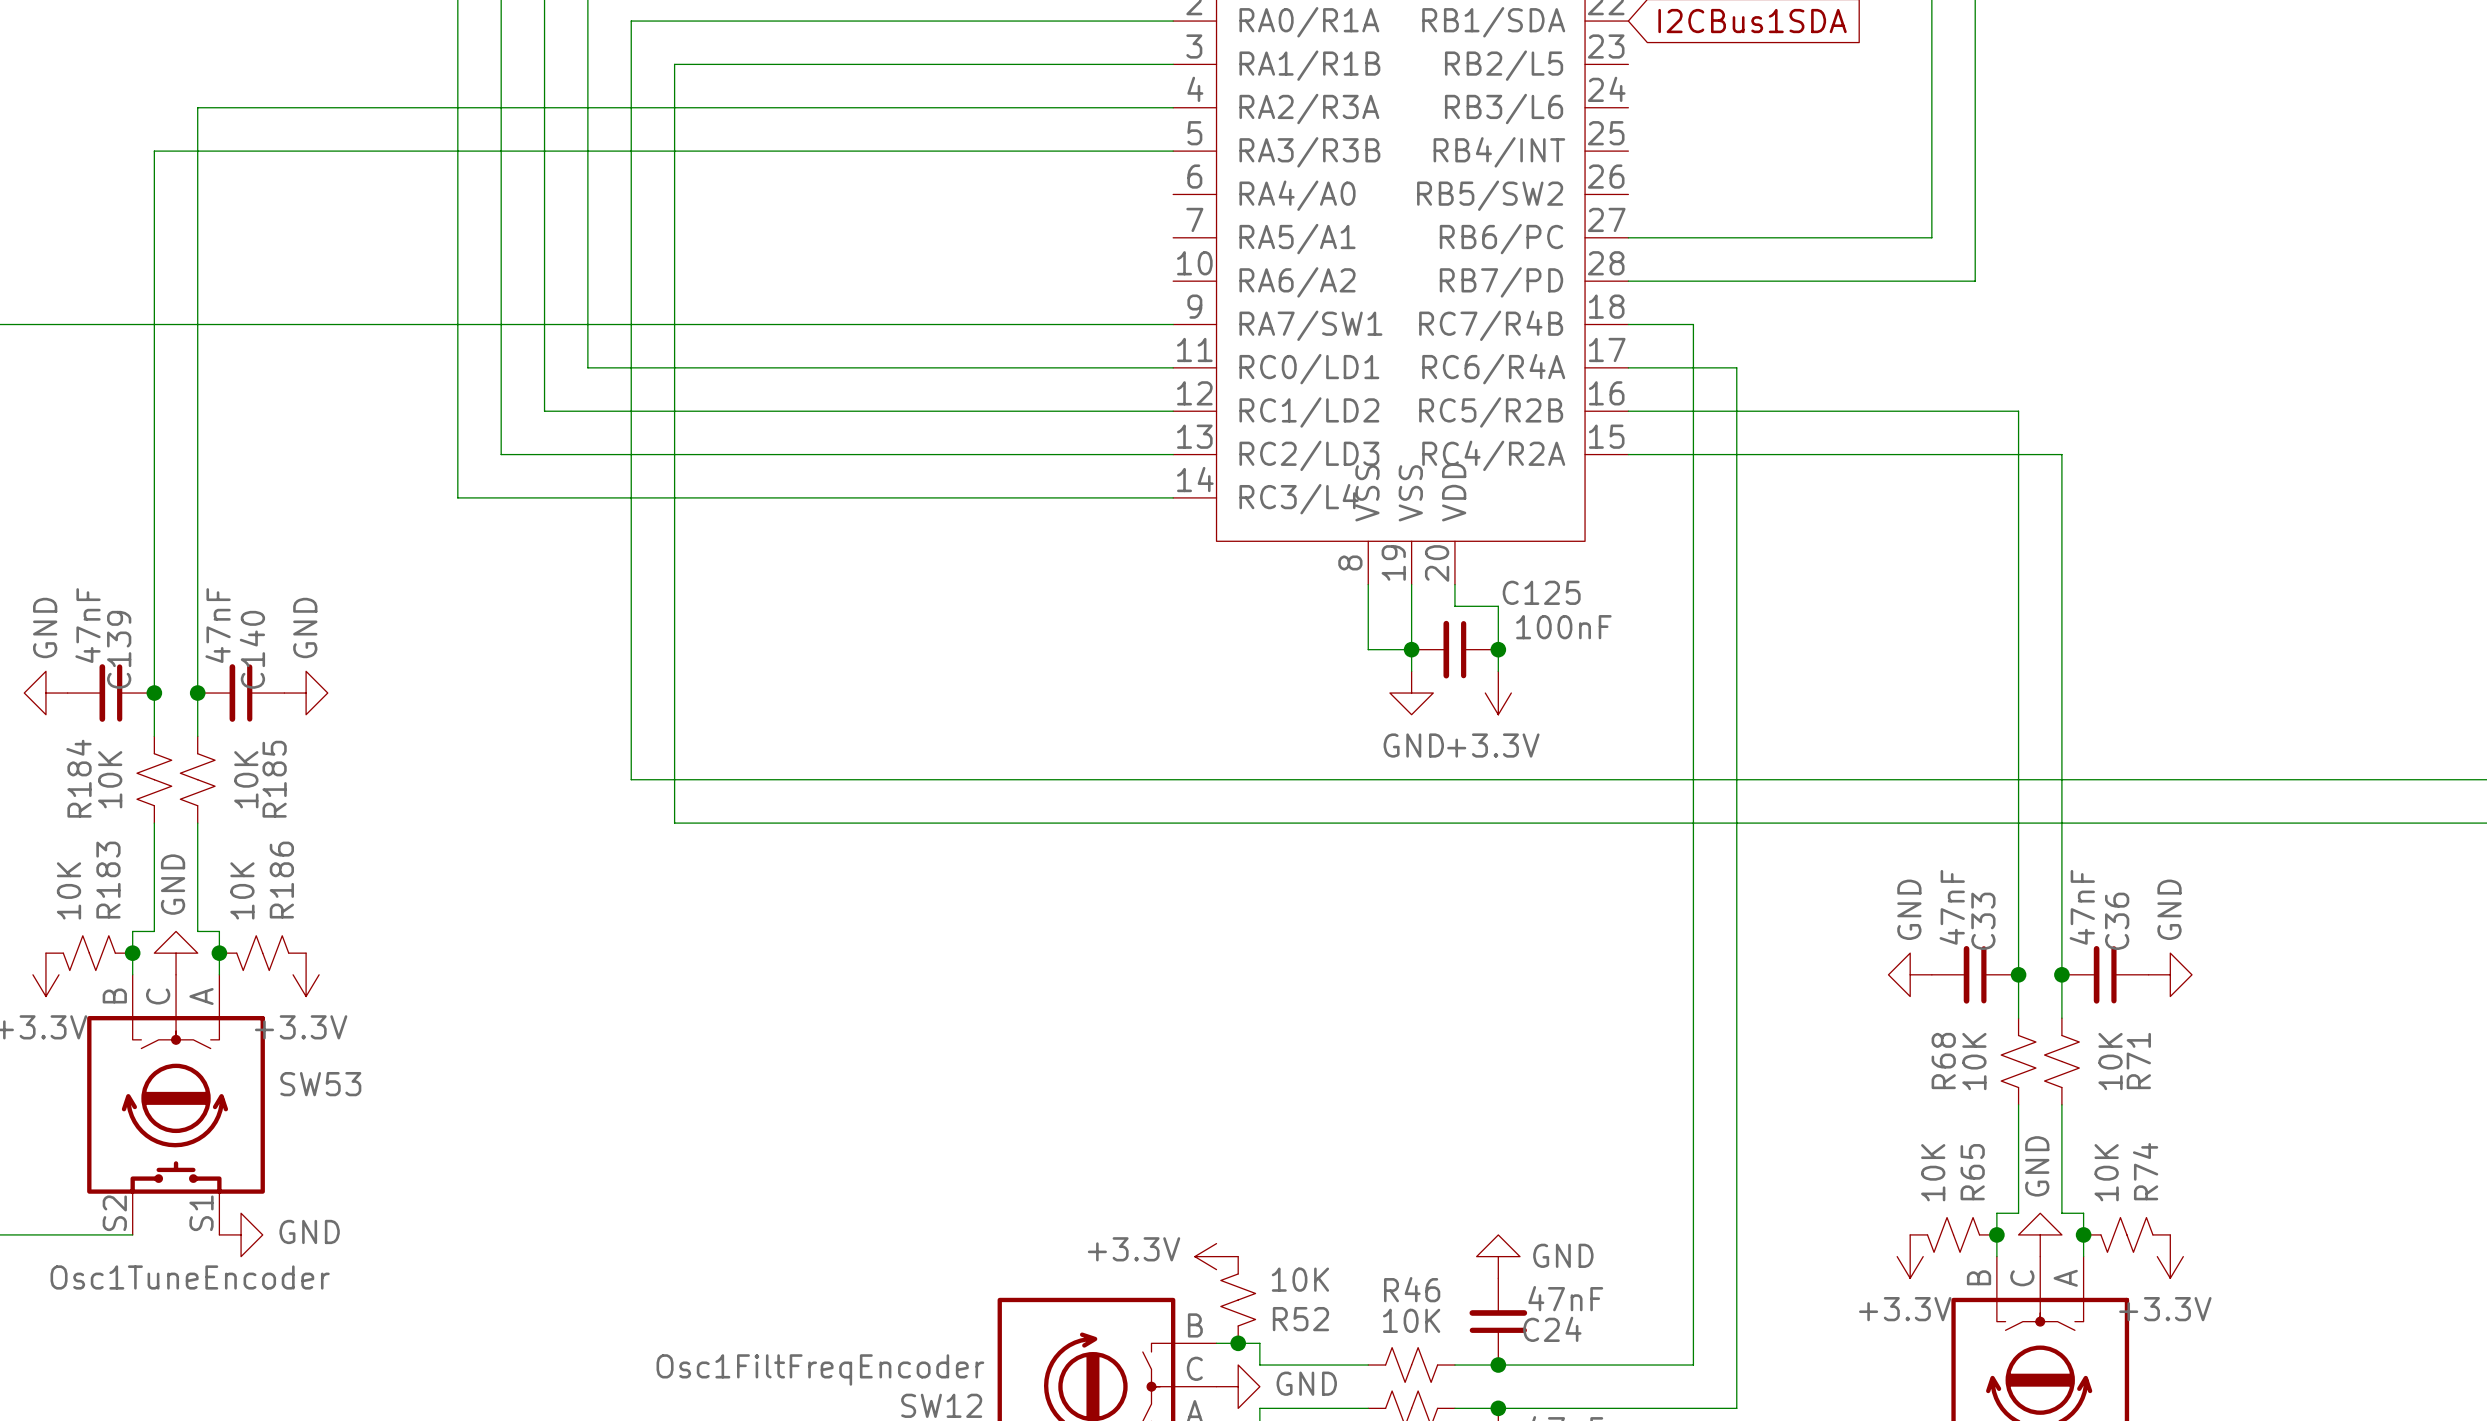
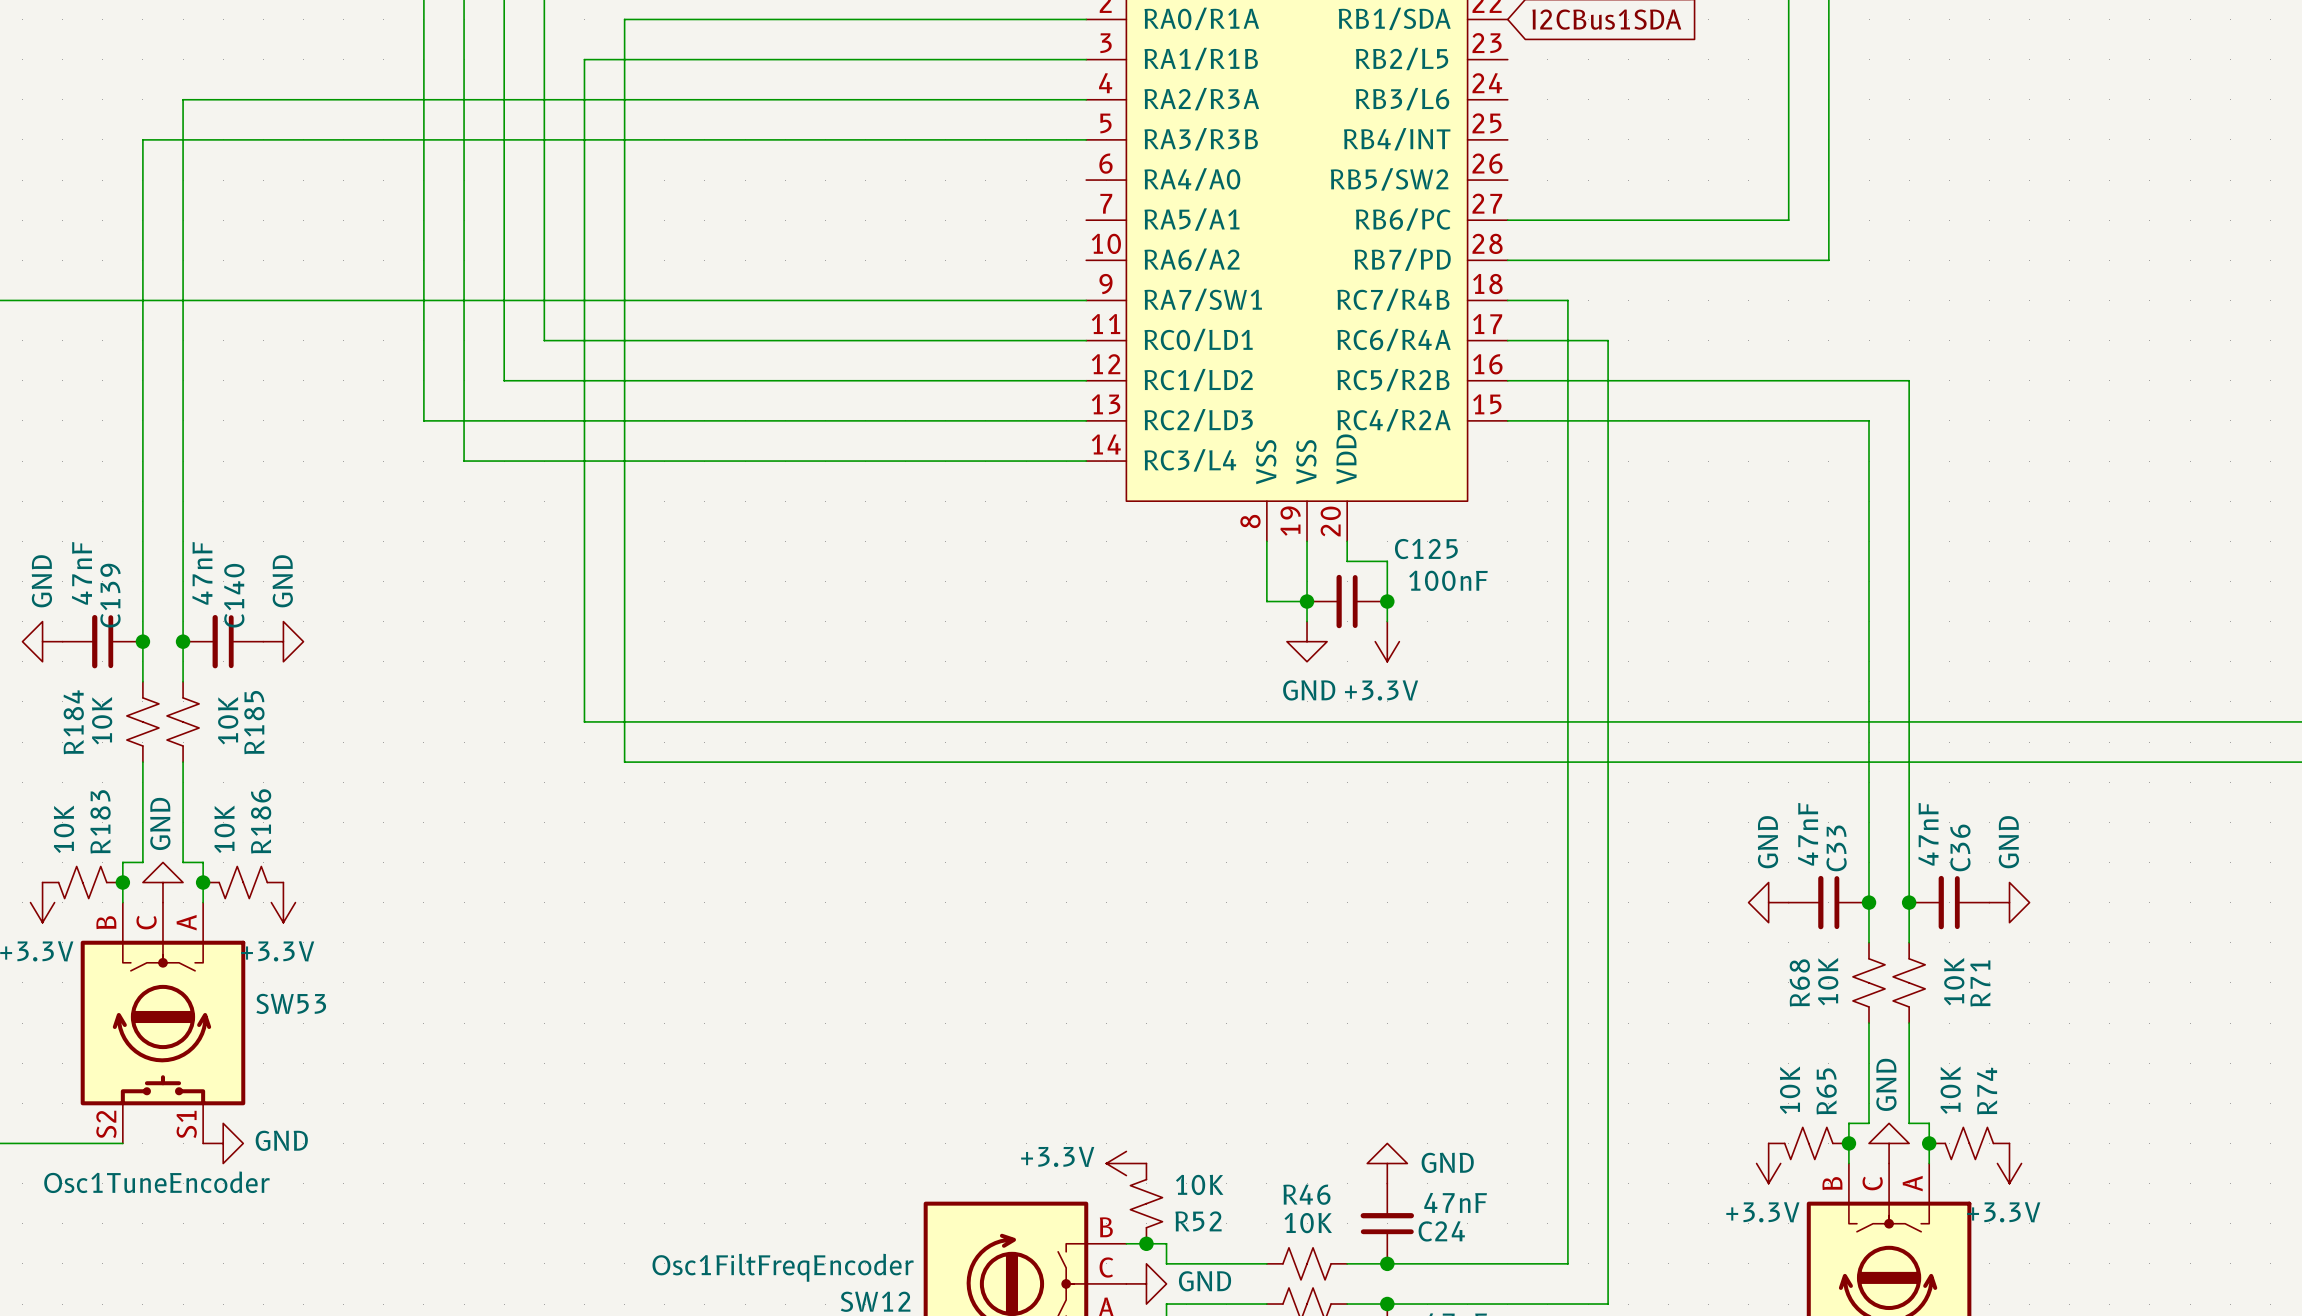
wire: (674, 21) (631, 21) (631, 64) -> (624, 19) (624, 59) (584, 59)
wire: (2018, 411) (2018, 454) (2061, 454) -> (1869, 380) (1909, 380) (1909, 420)
wire: (457, 454) (457, 497) (501, 497) -> (423, 420) (464, 420) (464, 461)

